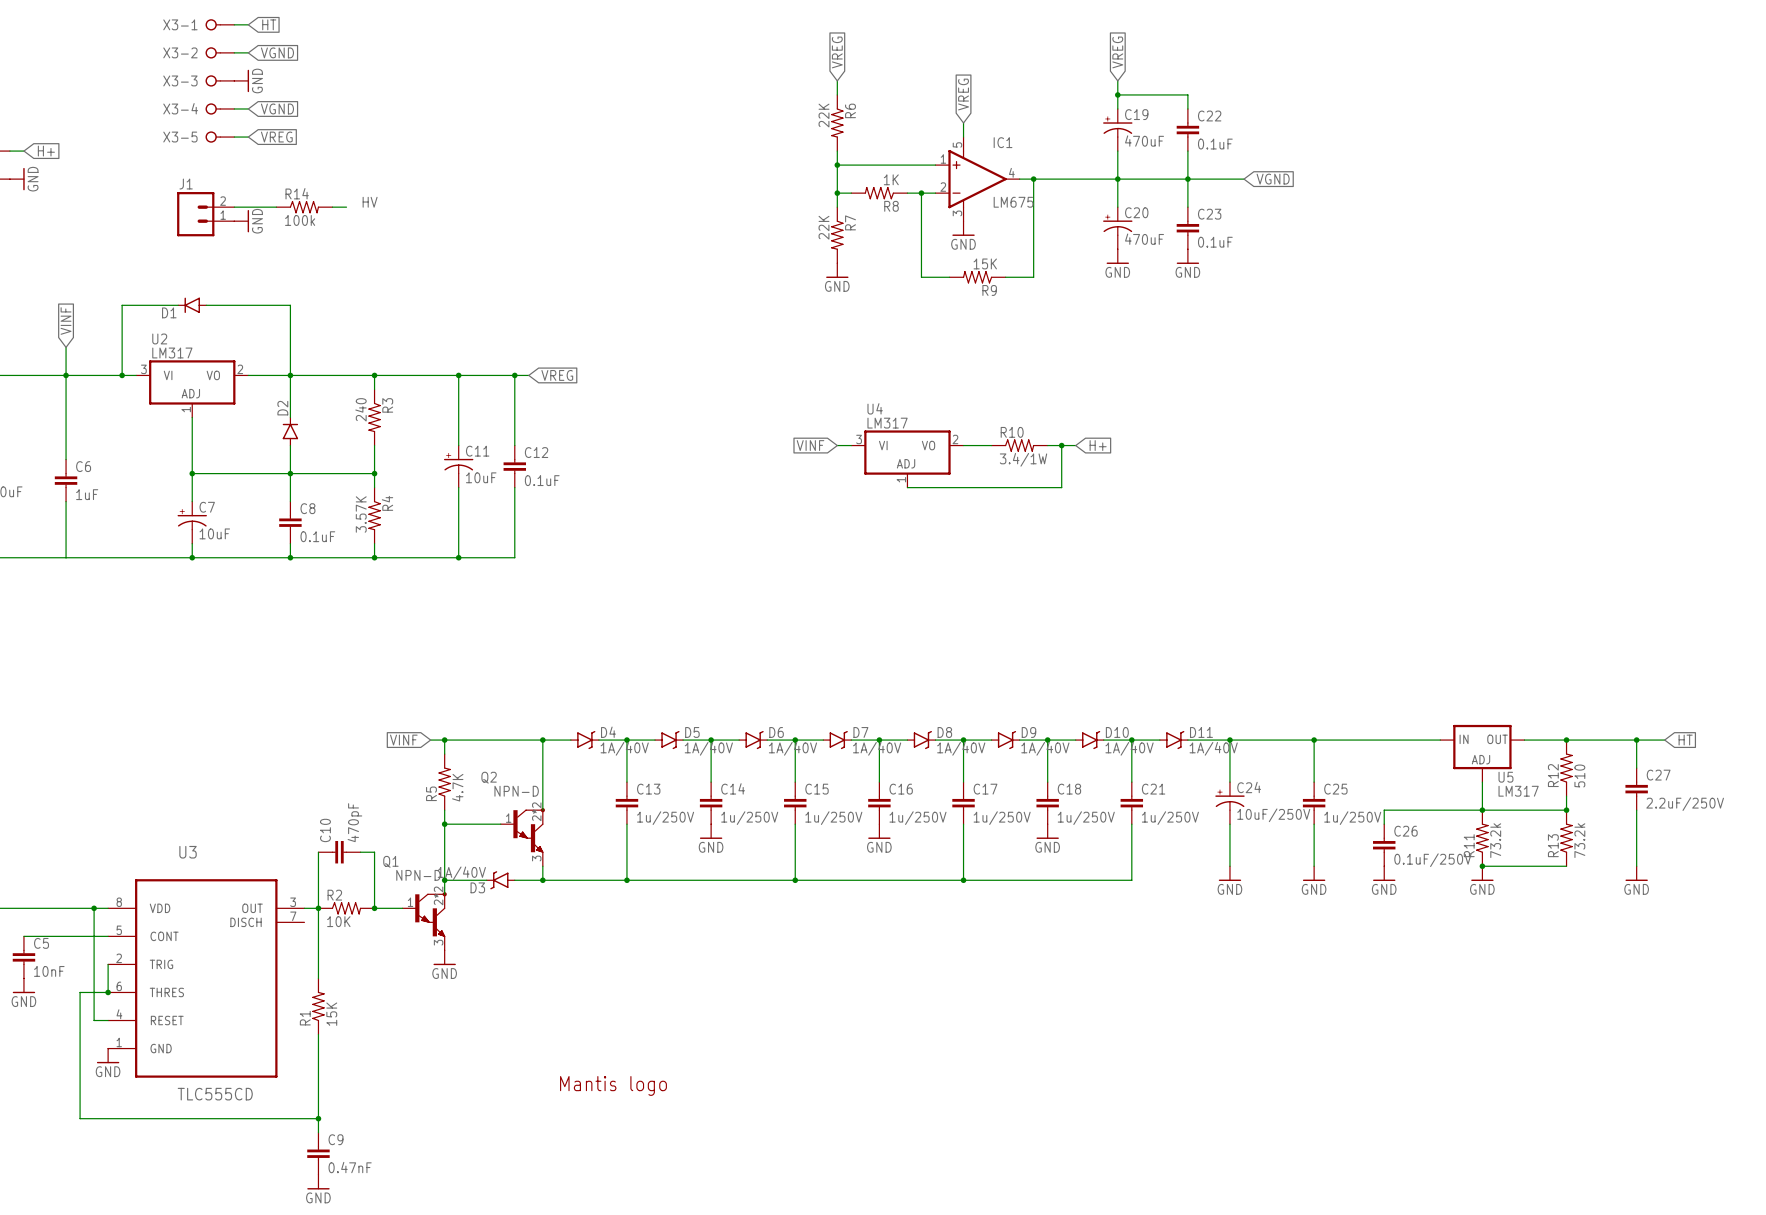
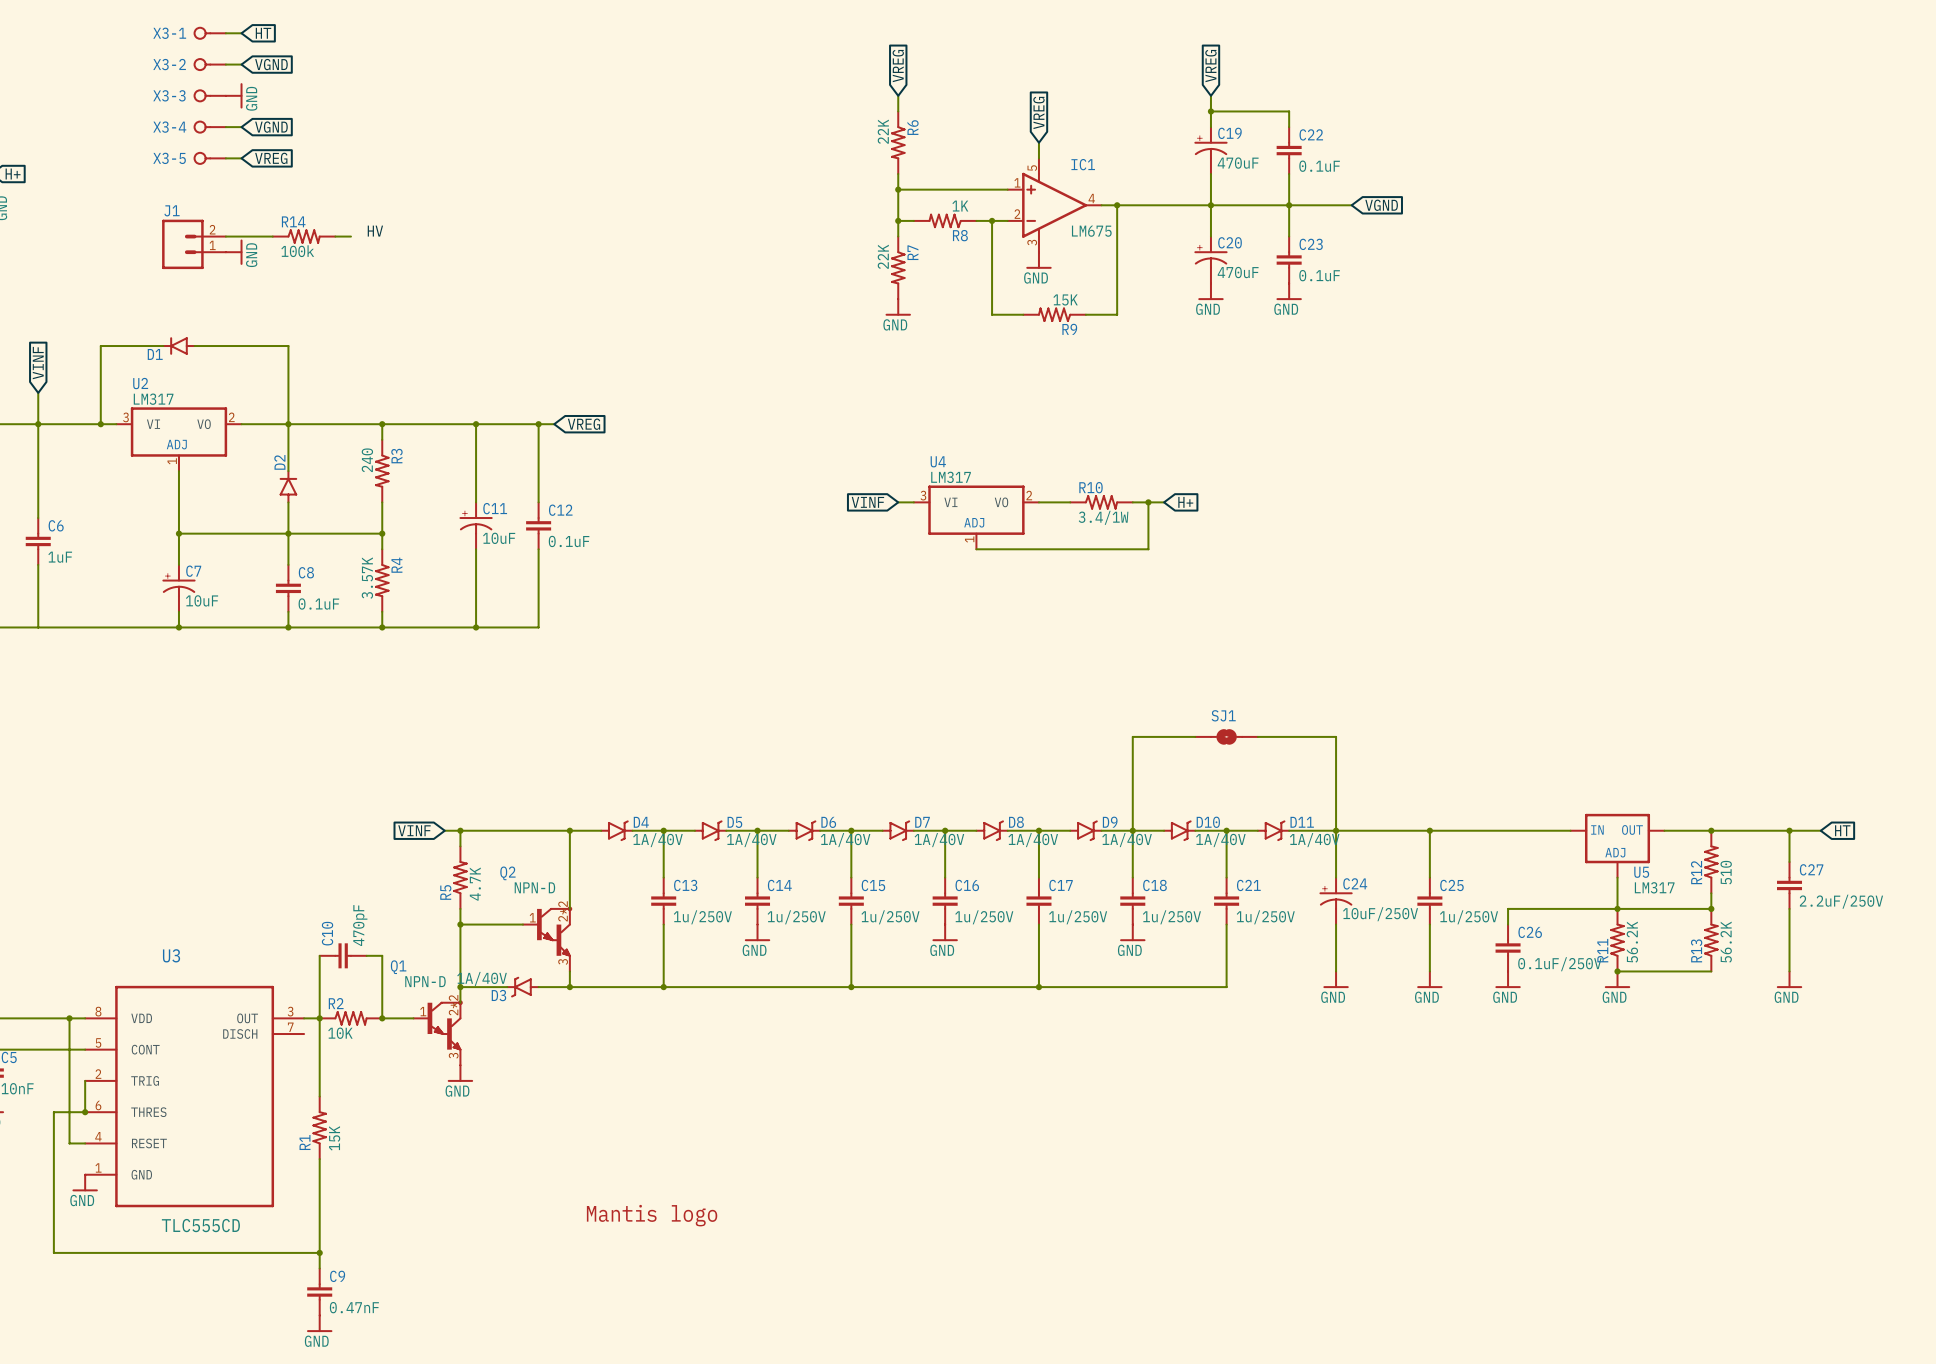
wire: none -> (1195, 736) (1132, 736) (1132, 830)
SJ1: none -> (1226, 736)
wire: none -> (1257, 736) (1336, 736) (1336, 830)
R11 value: 73.2k (1495, 840) -> 56.2K (1632, 942)
R13 value: 73.2k (1579, 840) -> 56.2K (1726, 942)

